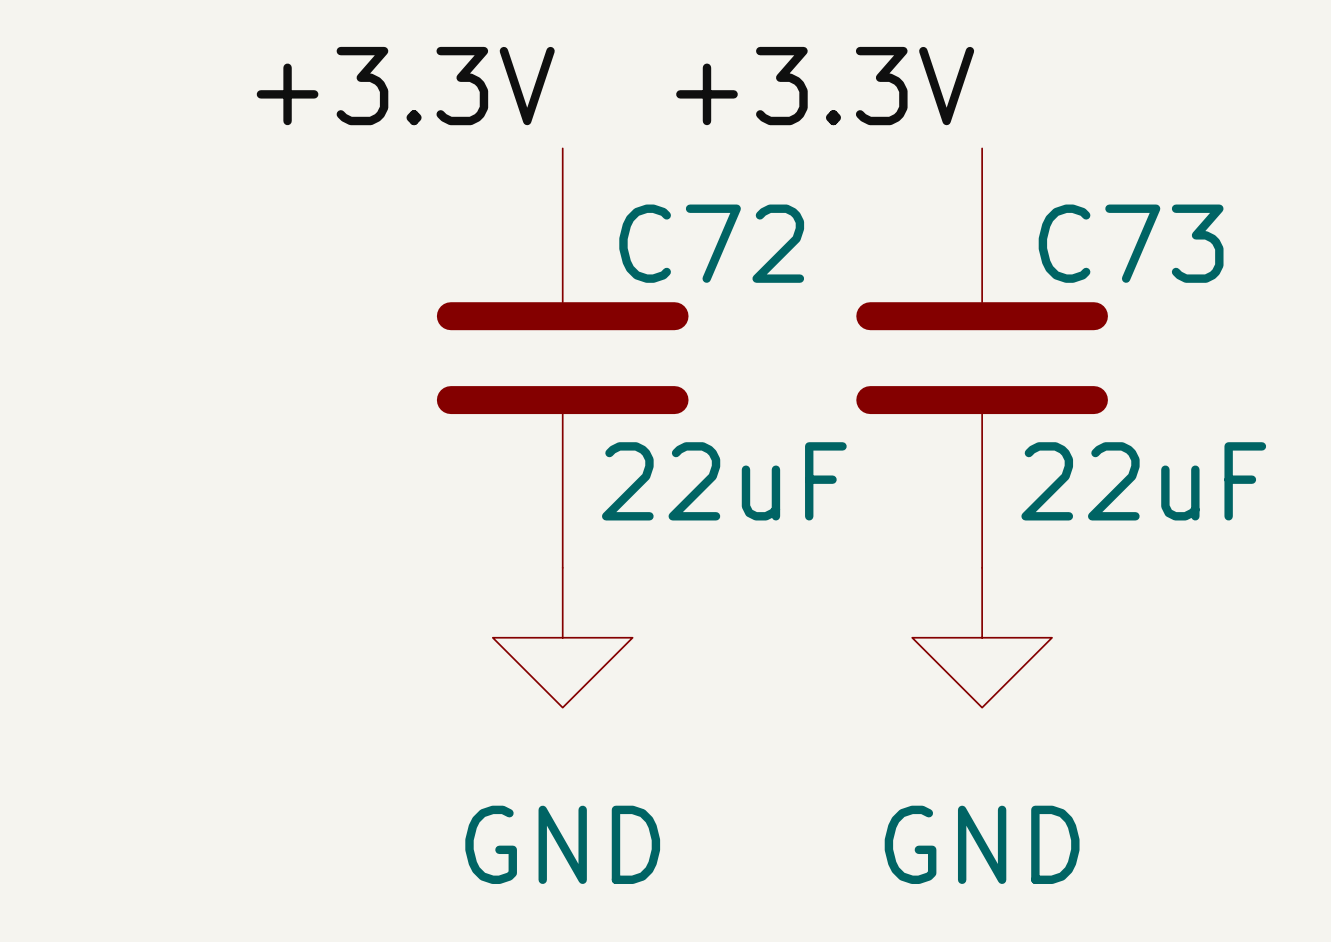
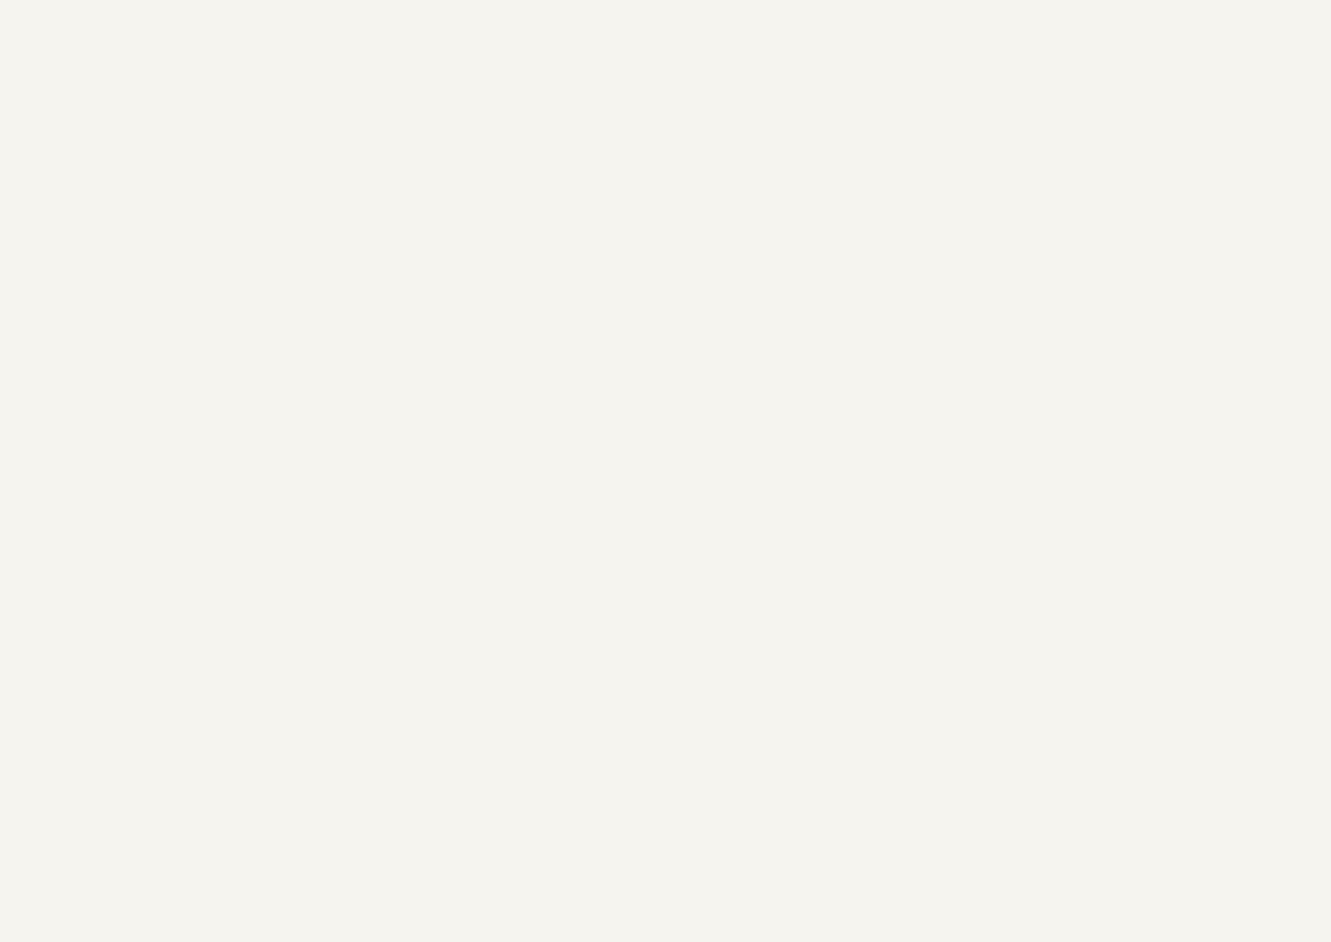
label: +3.3V (405, 86) -> none
label: +3.3V (825, 86) -> none
C72: 22uF (562, 358) -> none
C73: 22uF (982, 358) -> none
power symbol: GND (562, 637) -> none
power symbol: GND (982, 637) -> none

